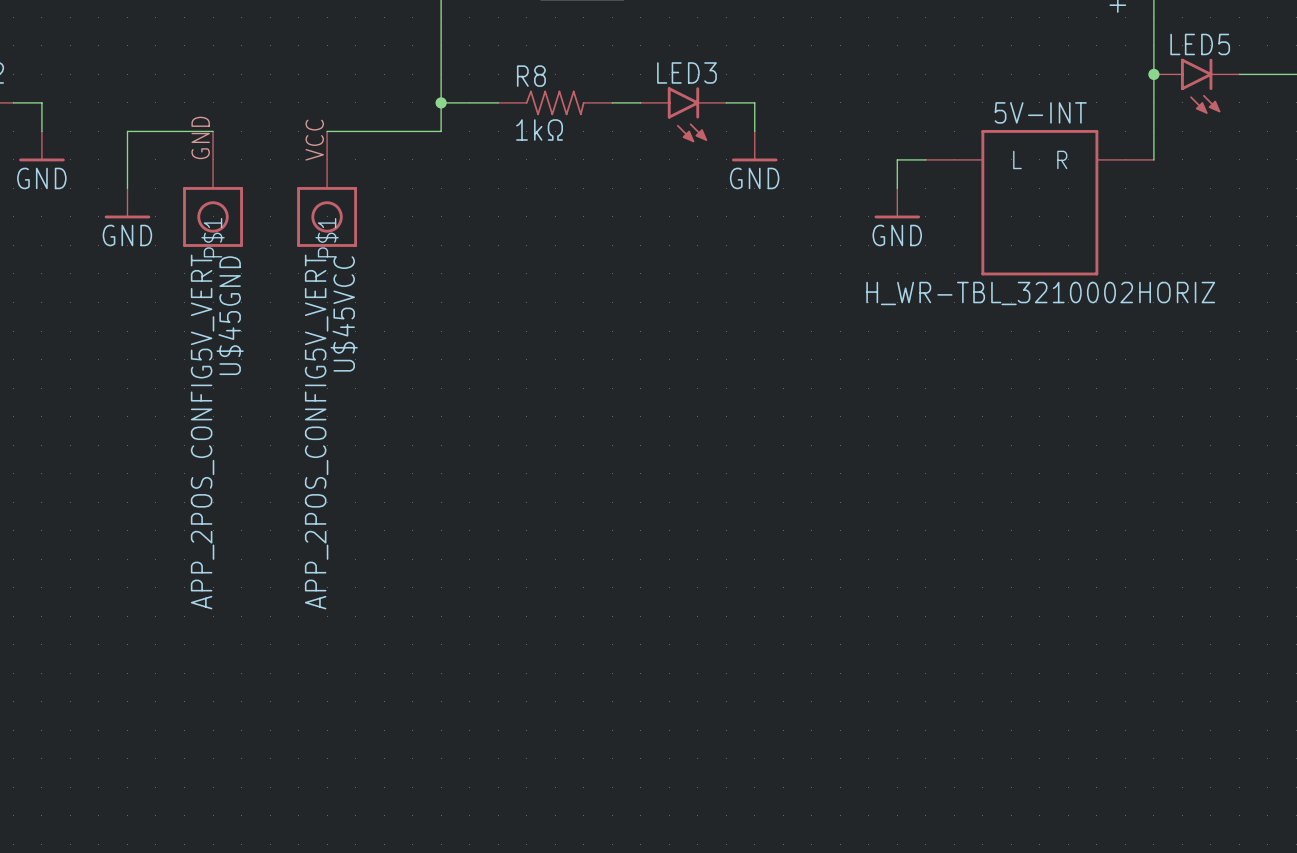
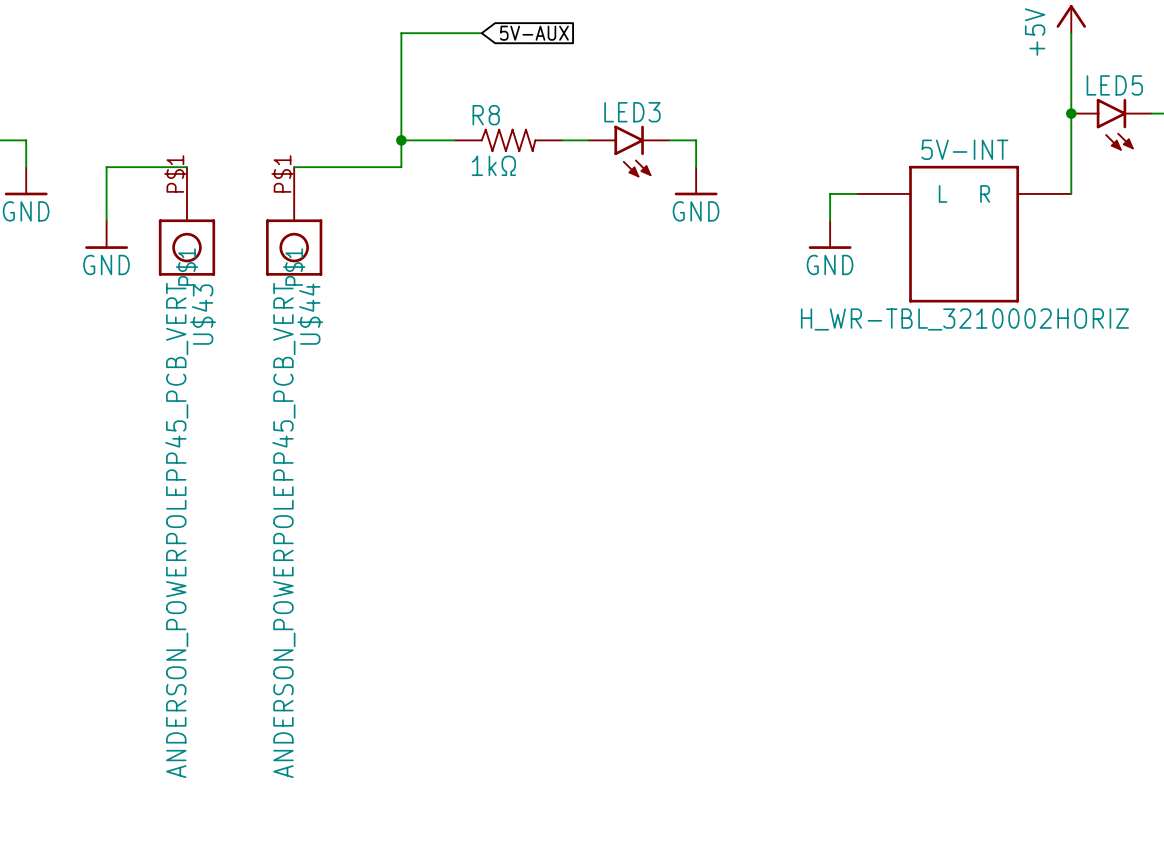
U$45GND pin number: GND (200, 137) -> P$1 (175, 173)
U$45VCC pin number: VCC (314, 140) -> P$1 (282, 173)
U$45VCC name: U$45VCC (344, 313) -> U$44 (310, 314)
U$45GND name: U$45GND (230, 315) -> U$43 (203, 314)
U$45GND value: APP_2POS_CONFIG5V_VERT (202, 431) -> ANDERSON_POWERPOLEPP45_PCB_VERT (176, 530)
U$45VCC value: APP_2POS_CONFIG5V_VERT (316, 431) -> ANDERSON_POWERPOLEPP45_PCB_VERT (283, 530)

